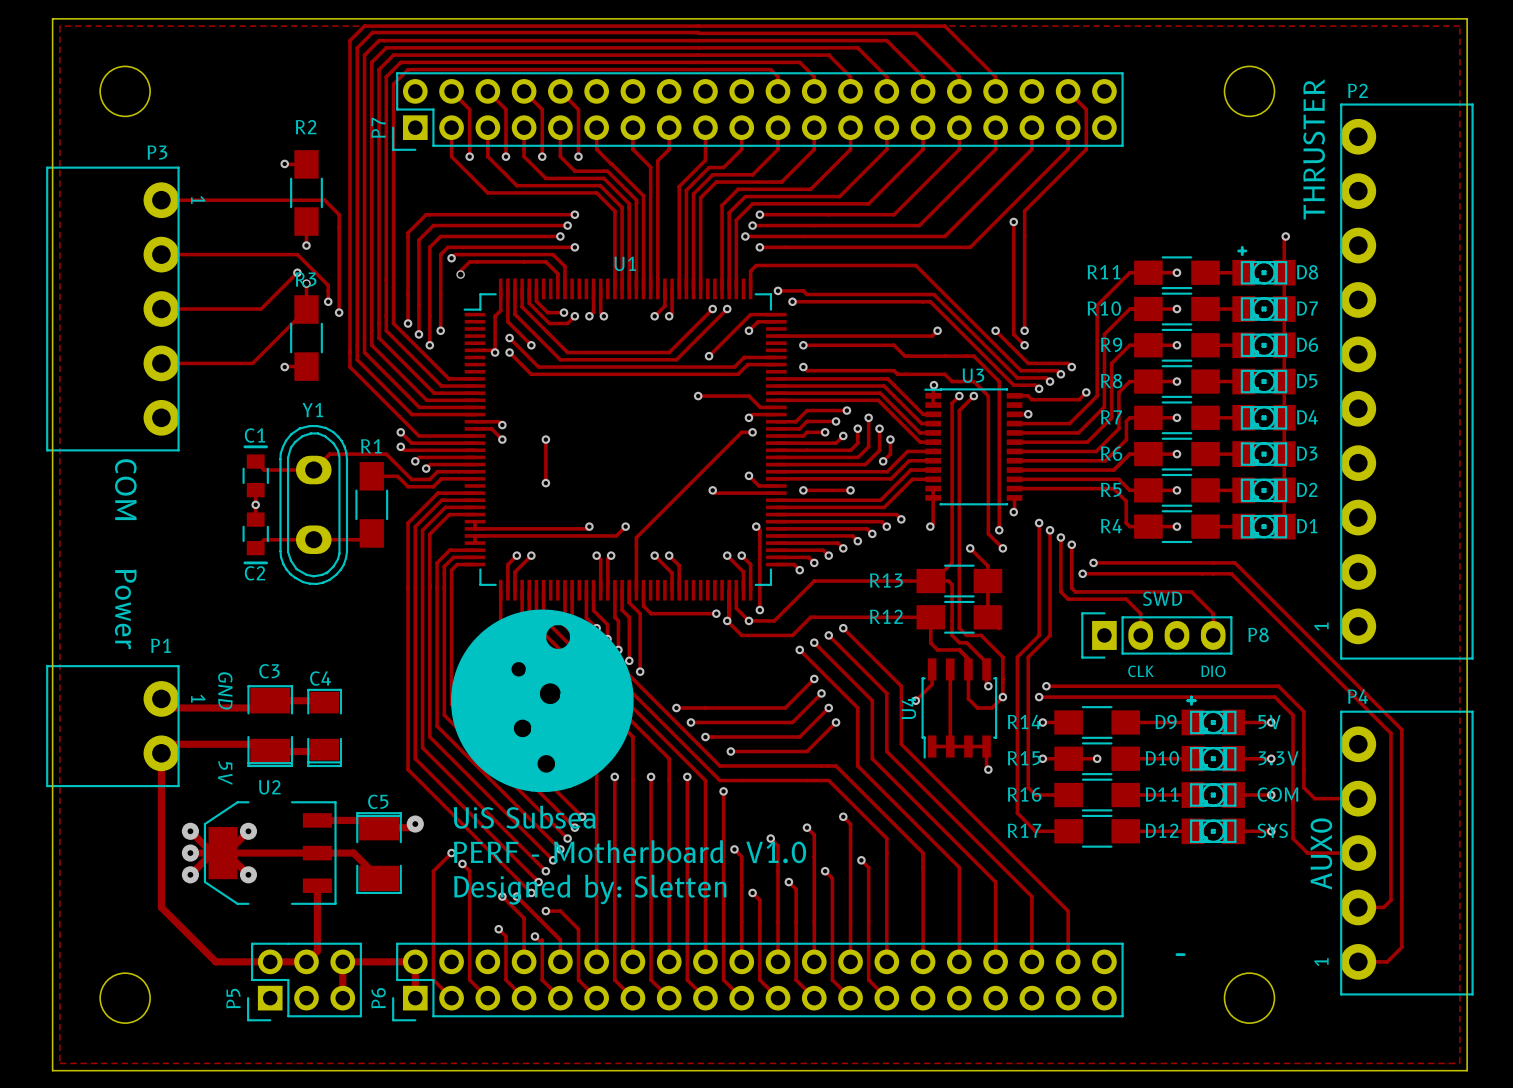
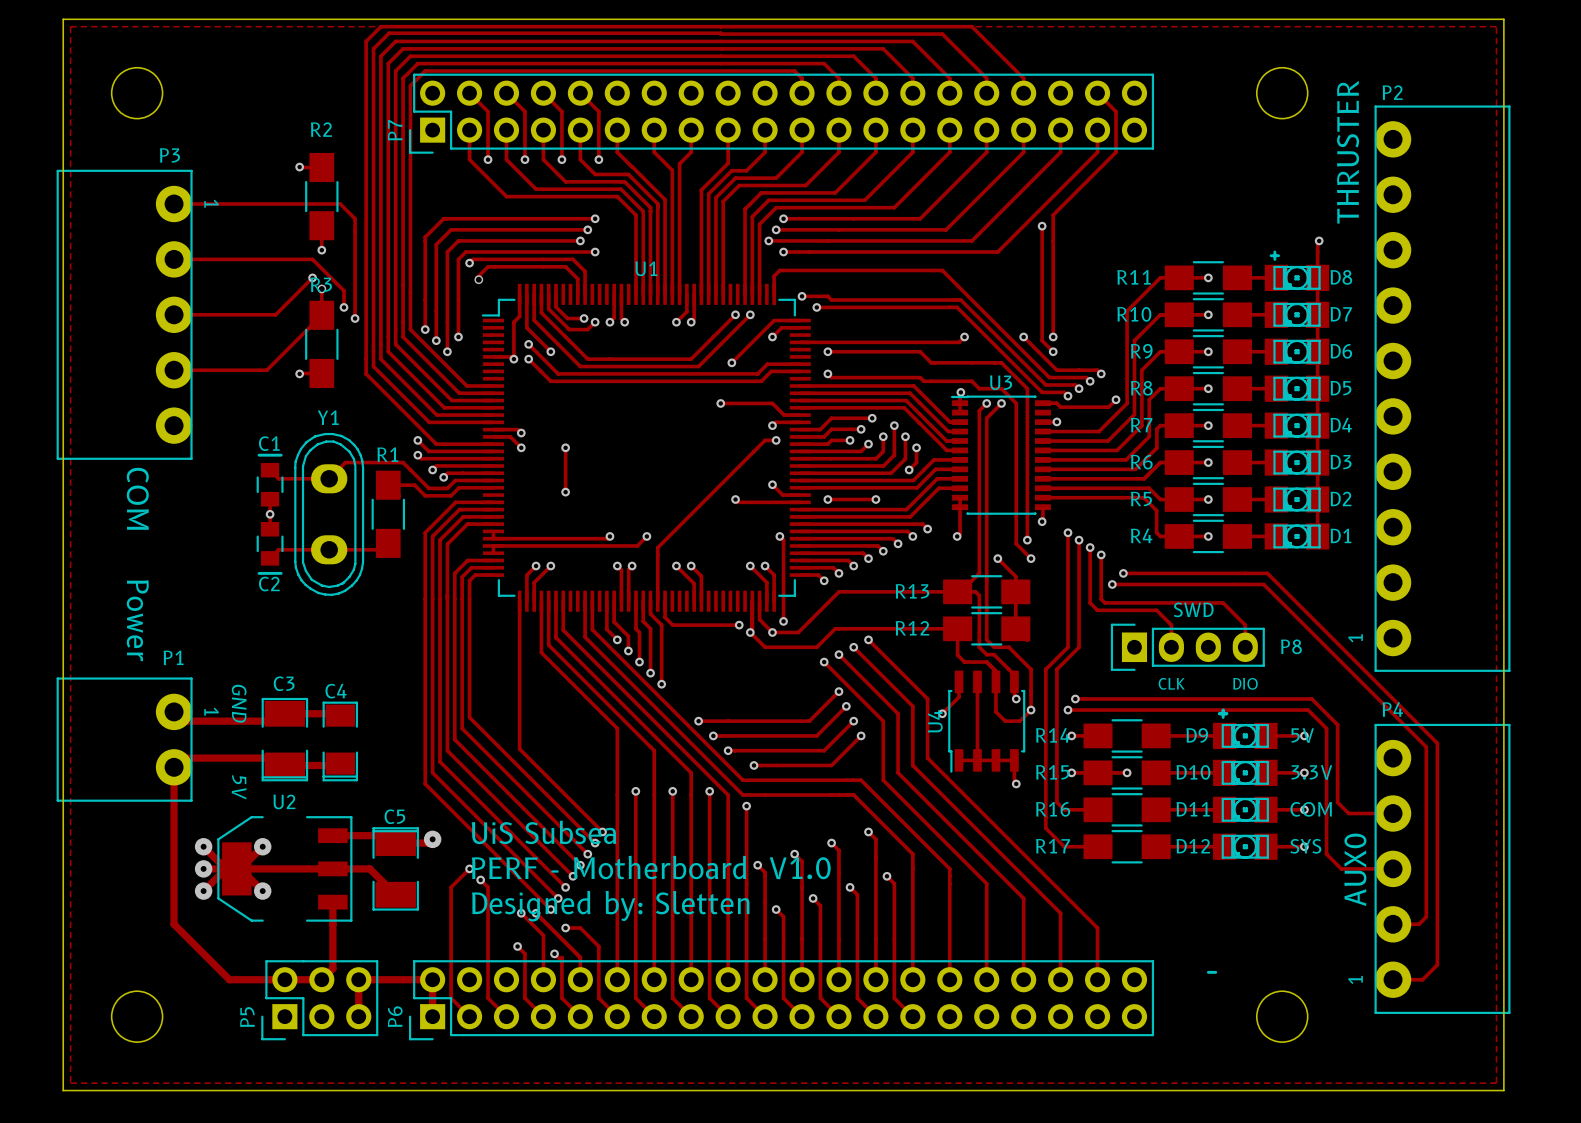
drawing: [451, 609, 634, 793] -> none

